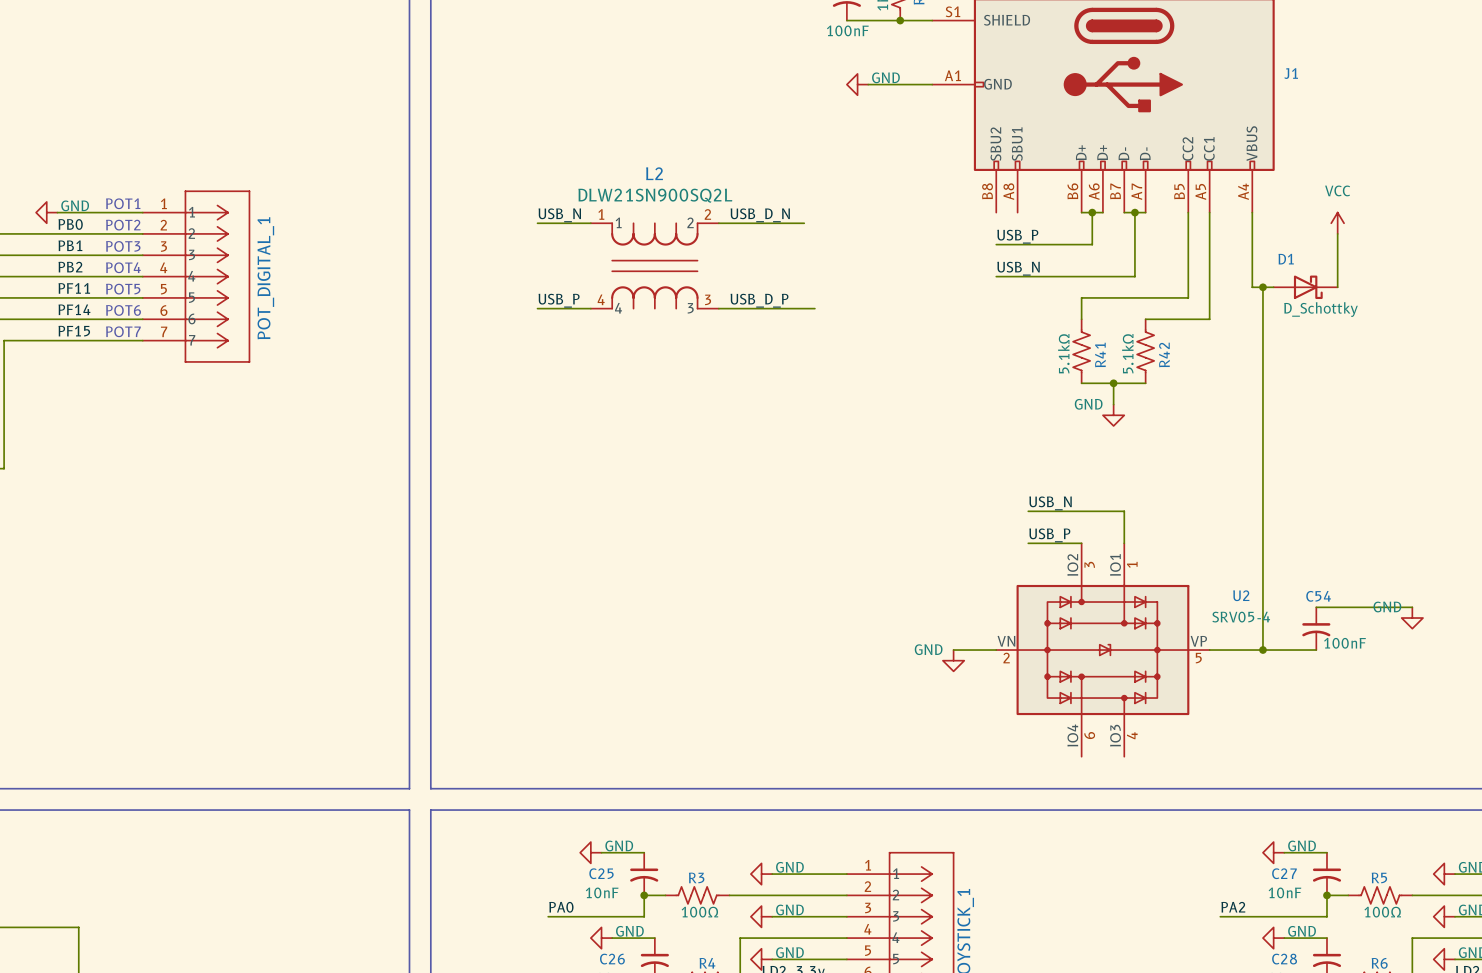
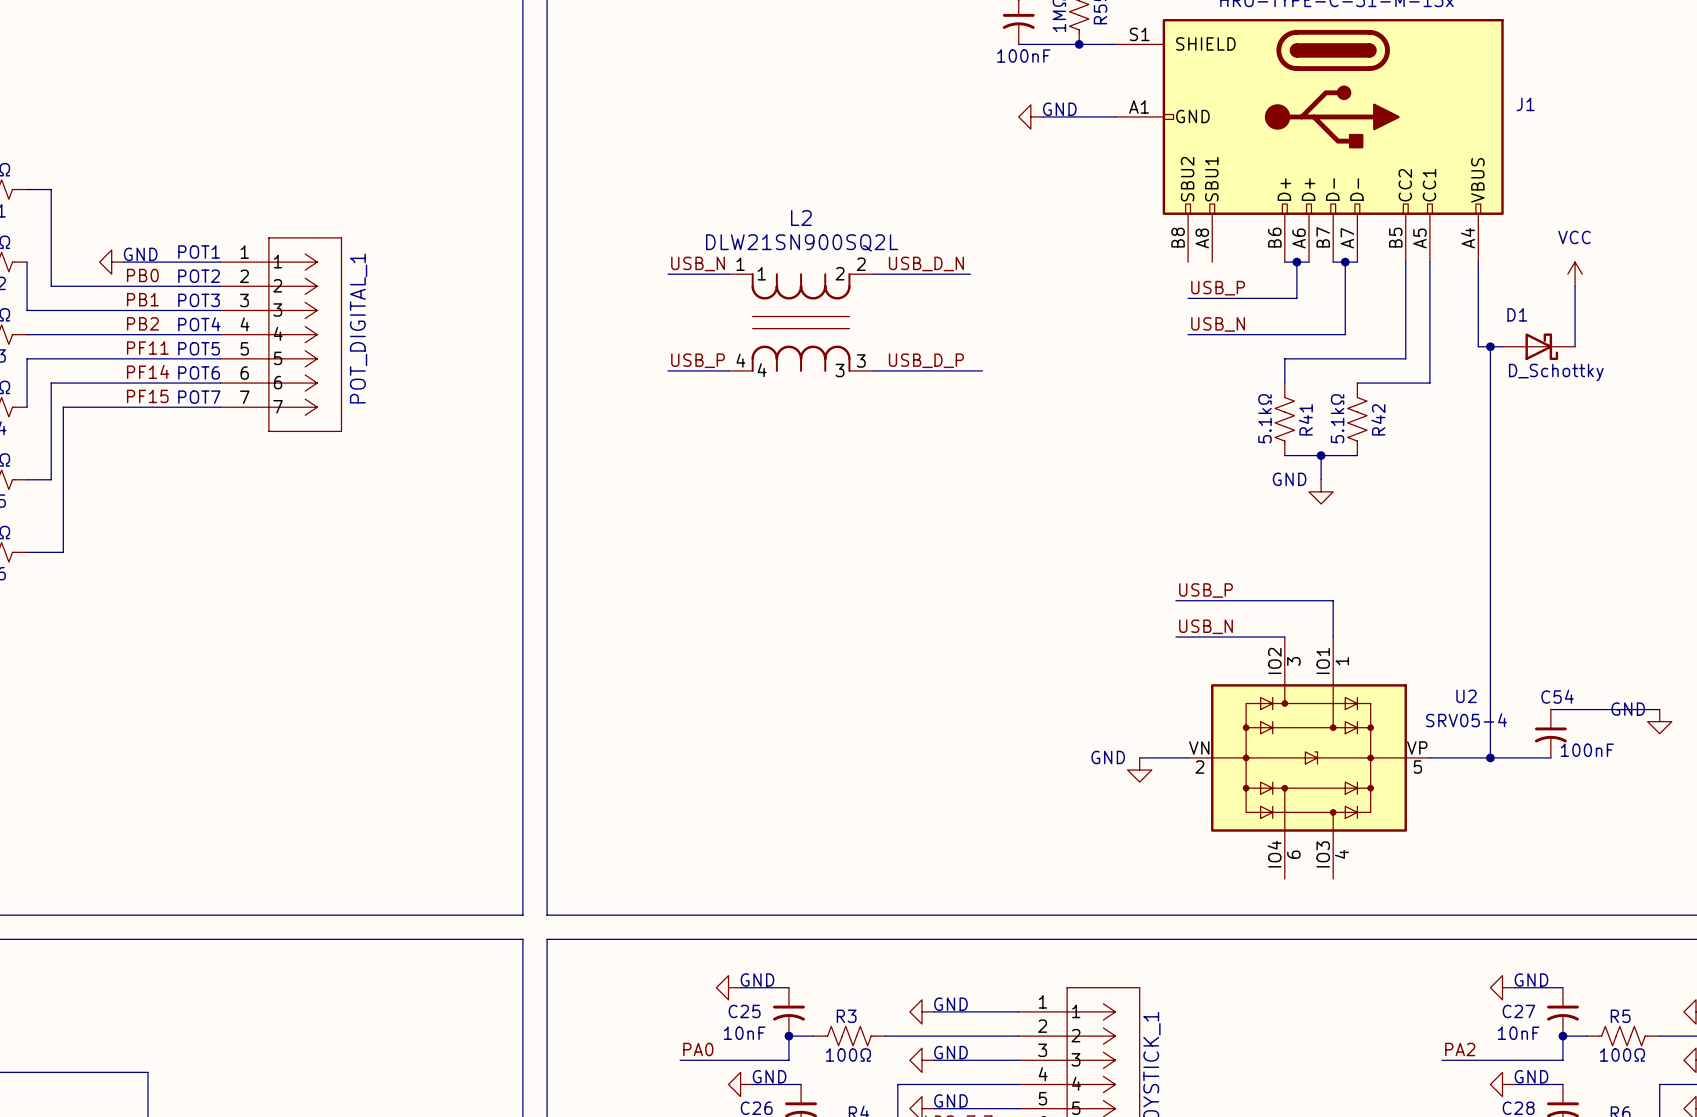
label position: USB_N (1050, 503) -> USB_N (1206, 626)
wire: none -> (1175, 600) (1224, 600)
label position: USB_P (1049, 535) -> USB_P (1206, 590)
wire: none -> (1175, 637) (1224, 637)

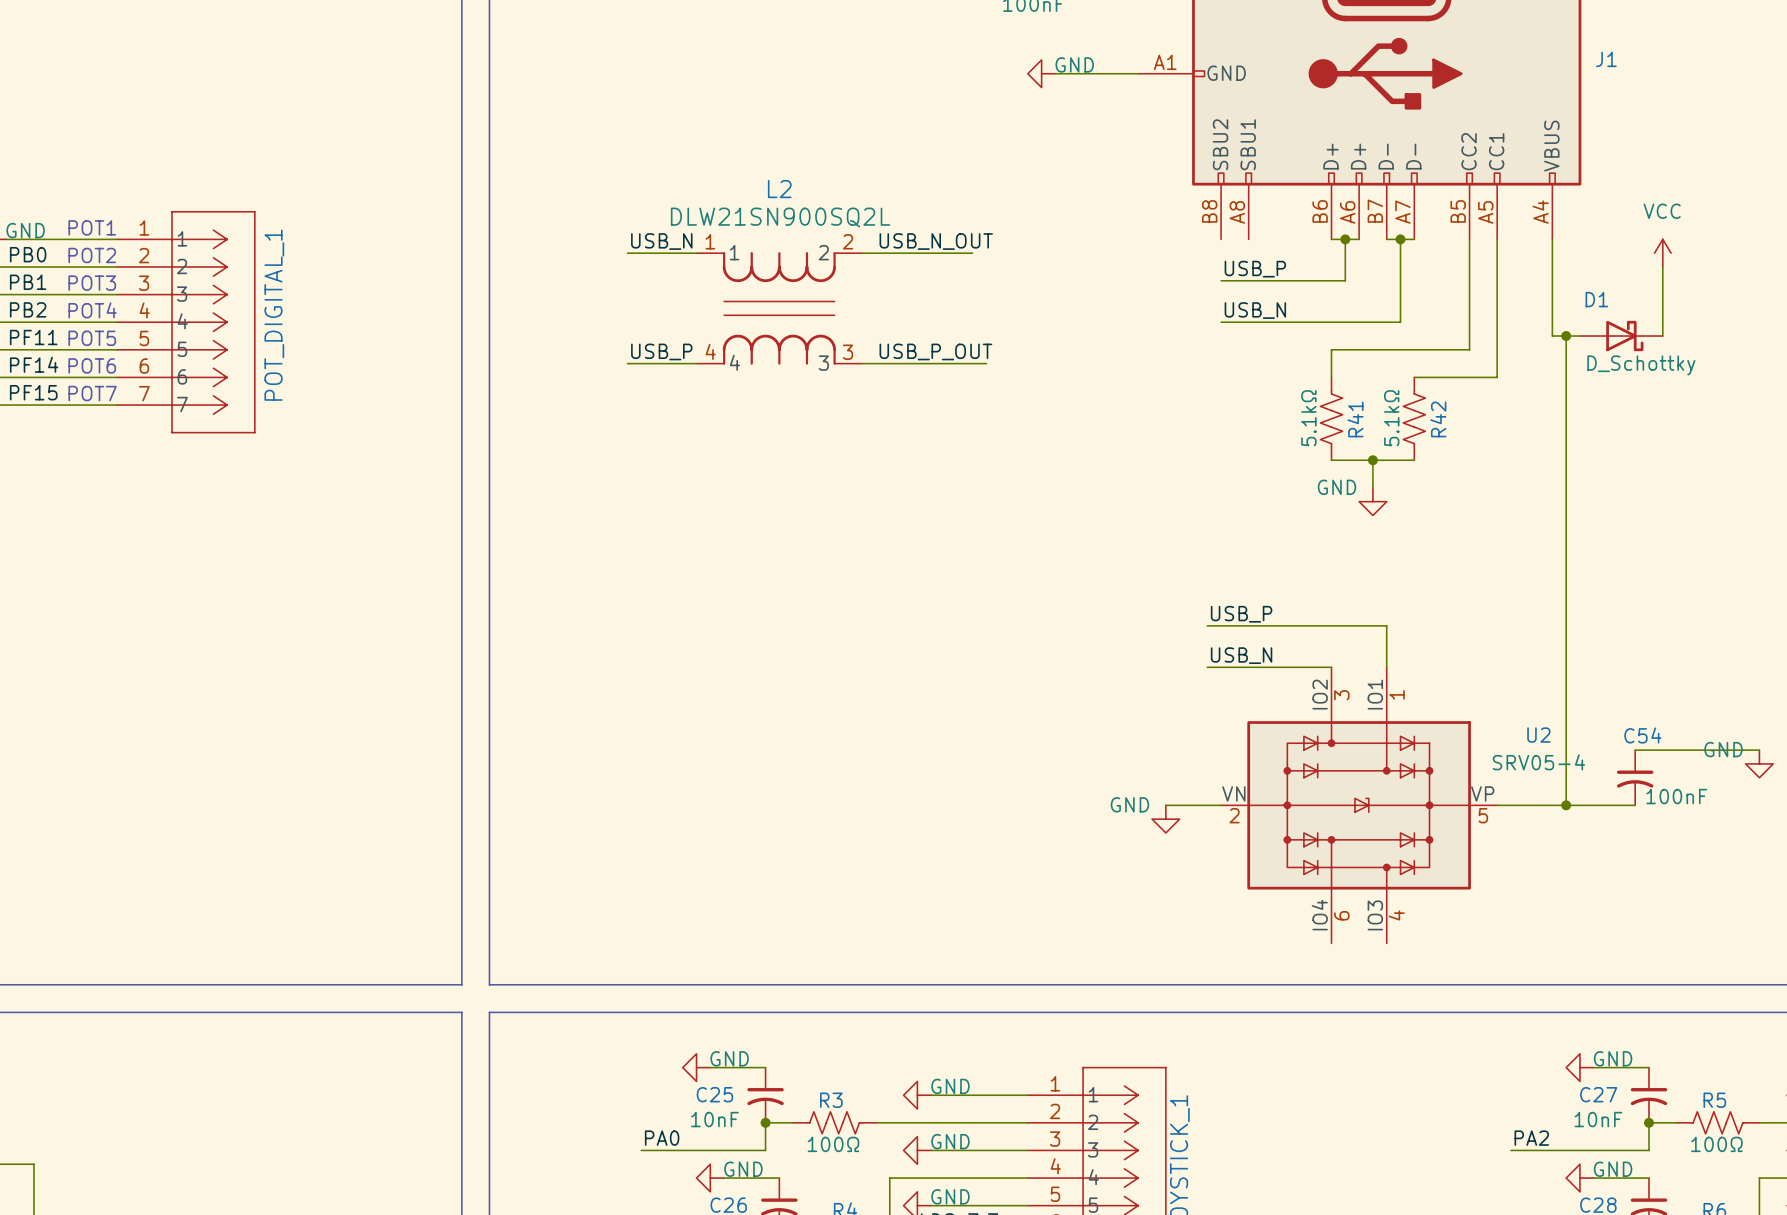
label: USB_D_N (926, 263) -> USB_N_OUT (936, 241)
label: USB_D_P (926, 360) -> USB_P_OUT (935, 351)

